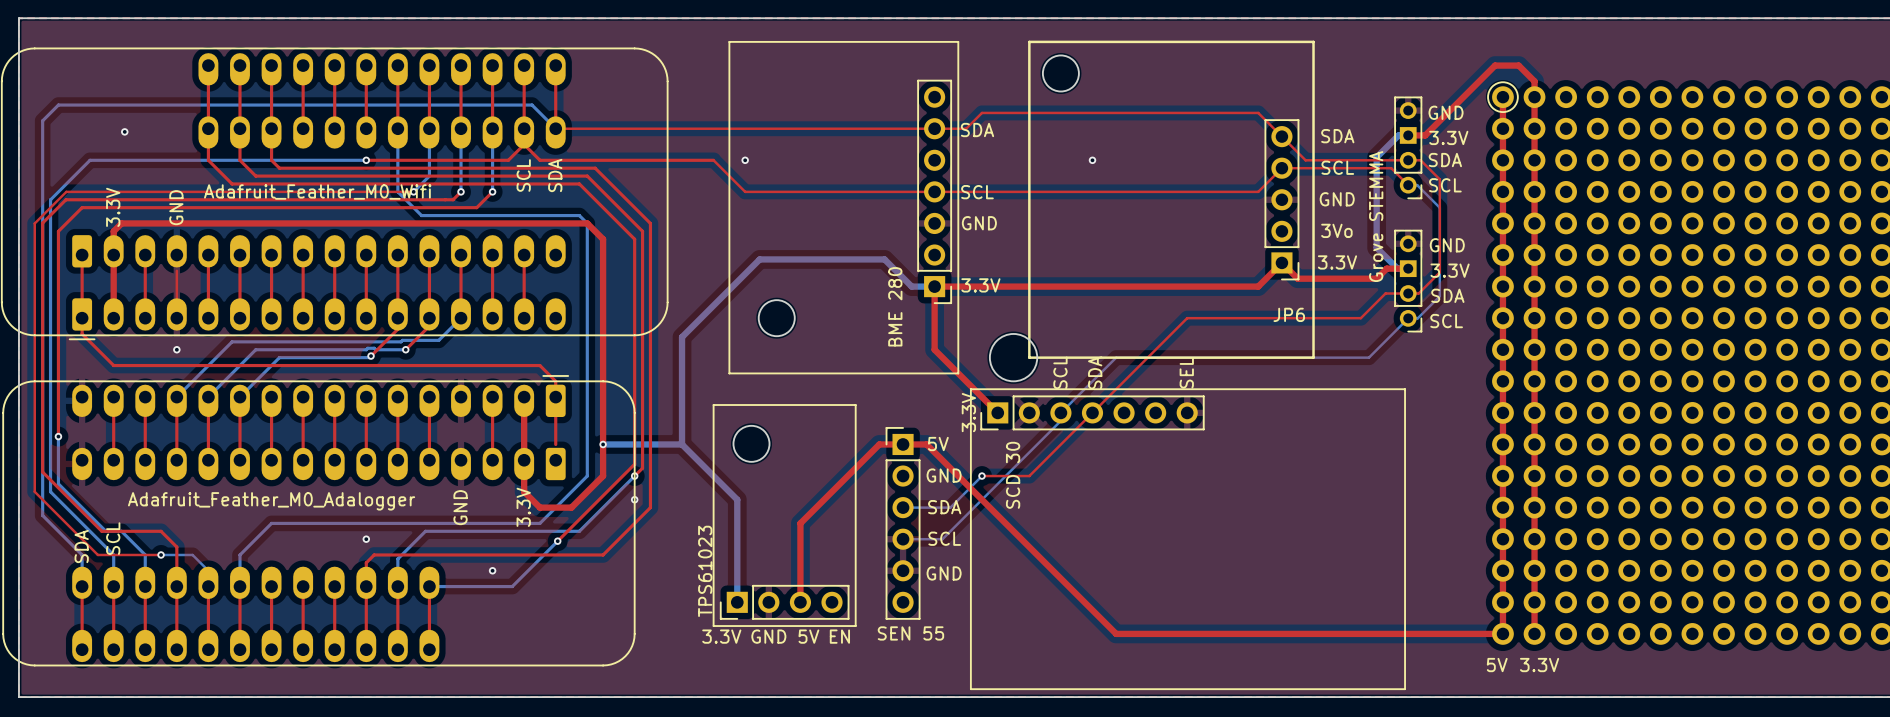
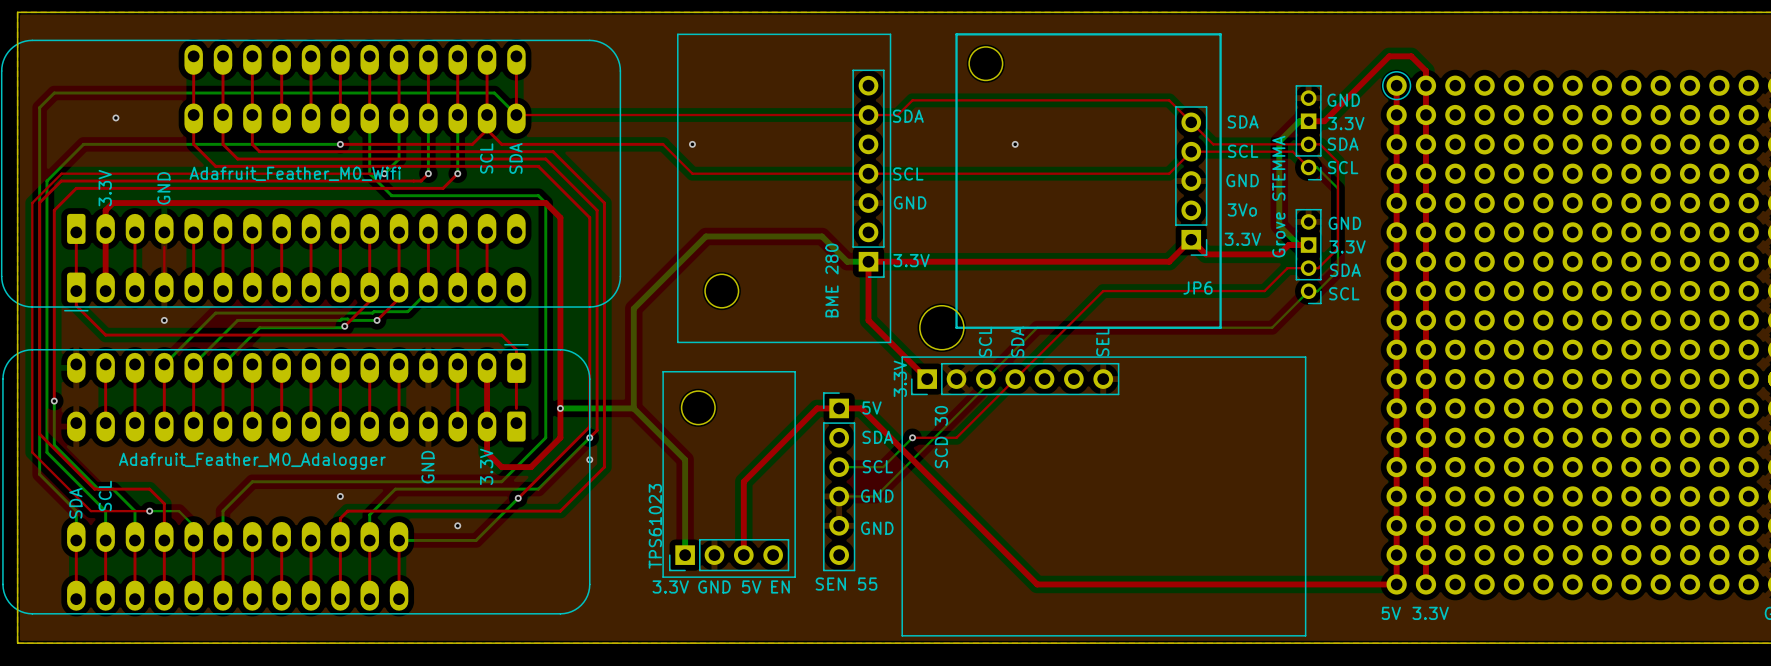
text: GND (944, 475) -> SDA (877, 437)
text: SDA (944, 507) -> SCL (877, 466)
text: SCL (944, 538) -> GND (877, 496)

